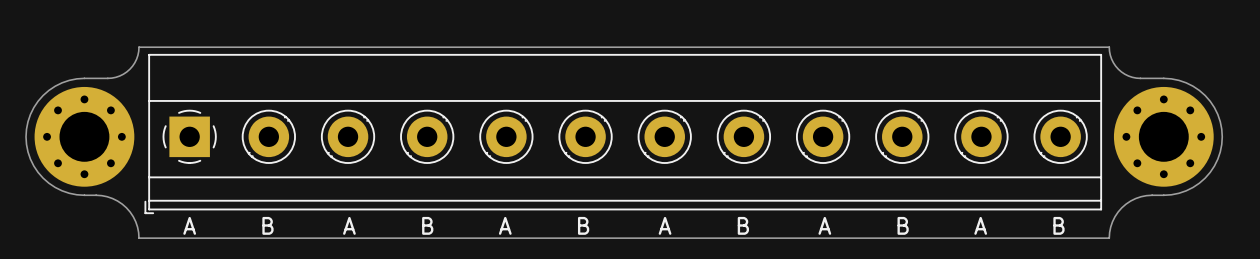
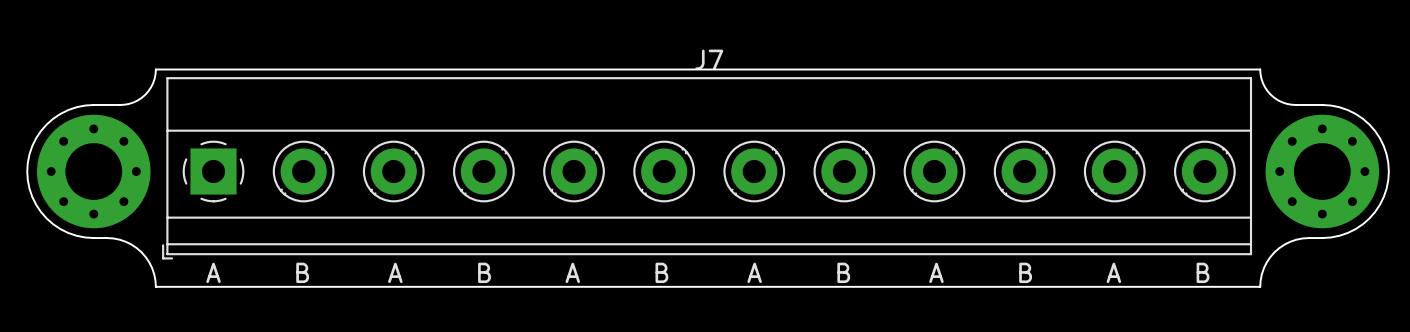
J7 name: none -> J7 (709, 59)

